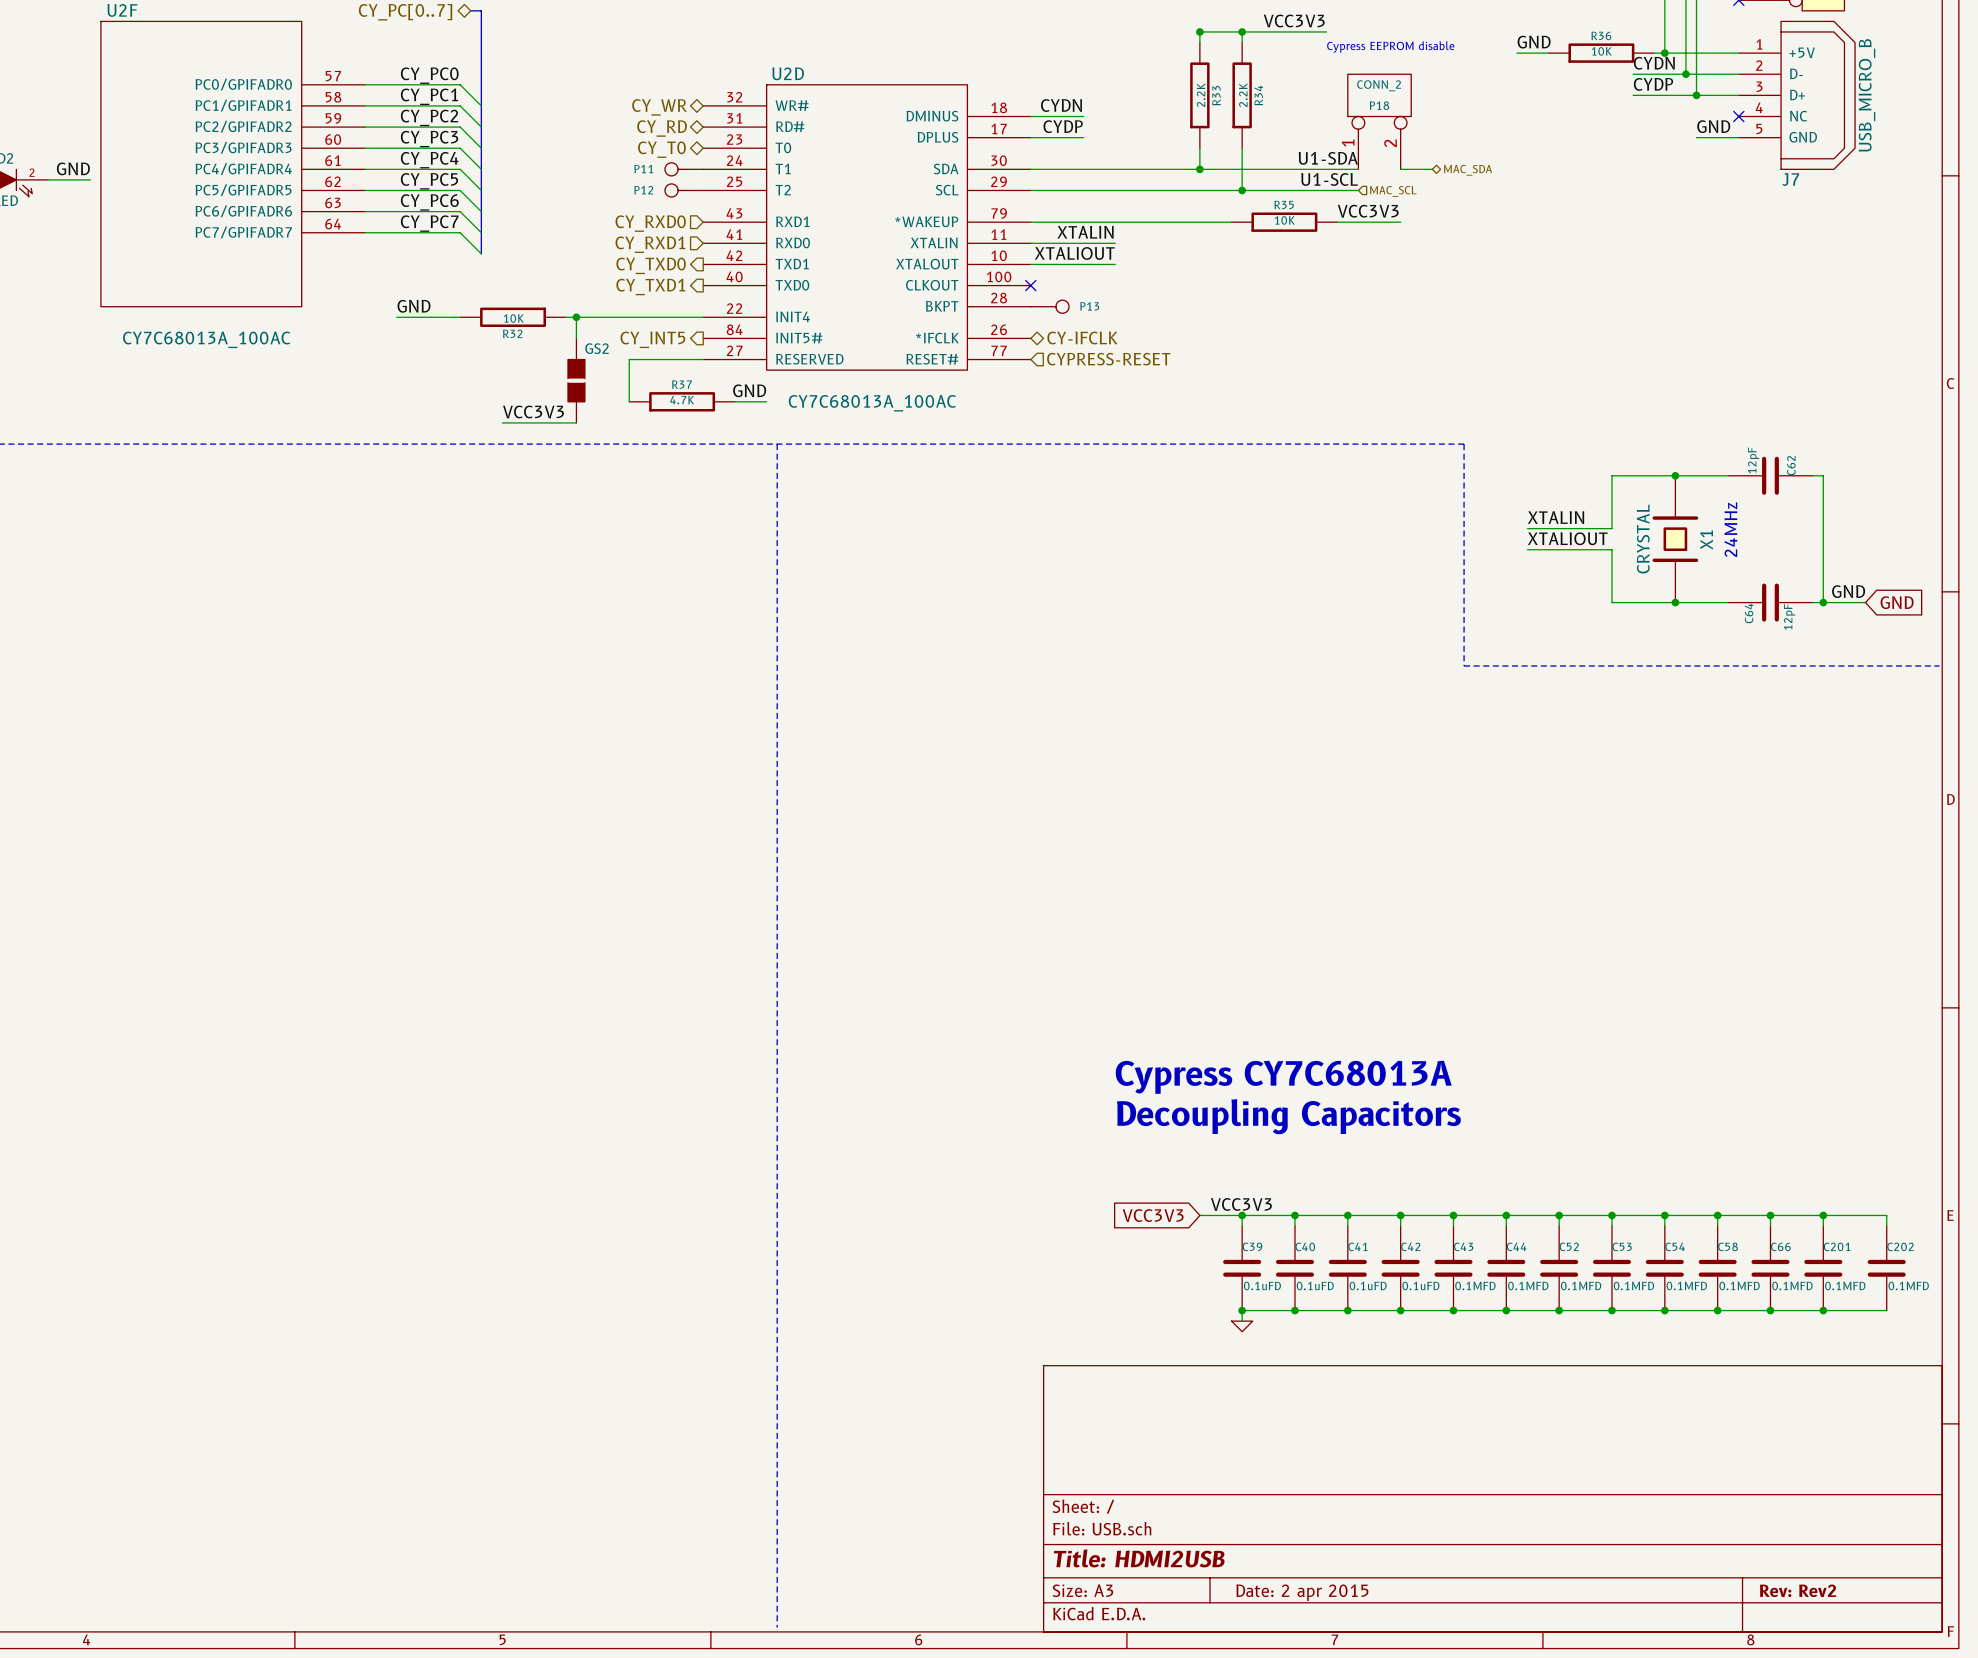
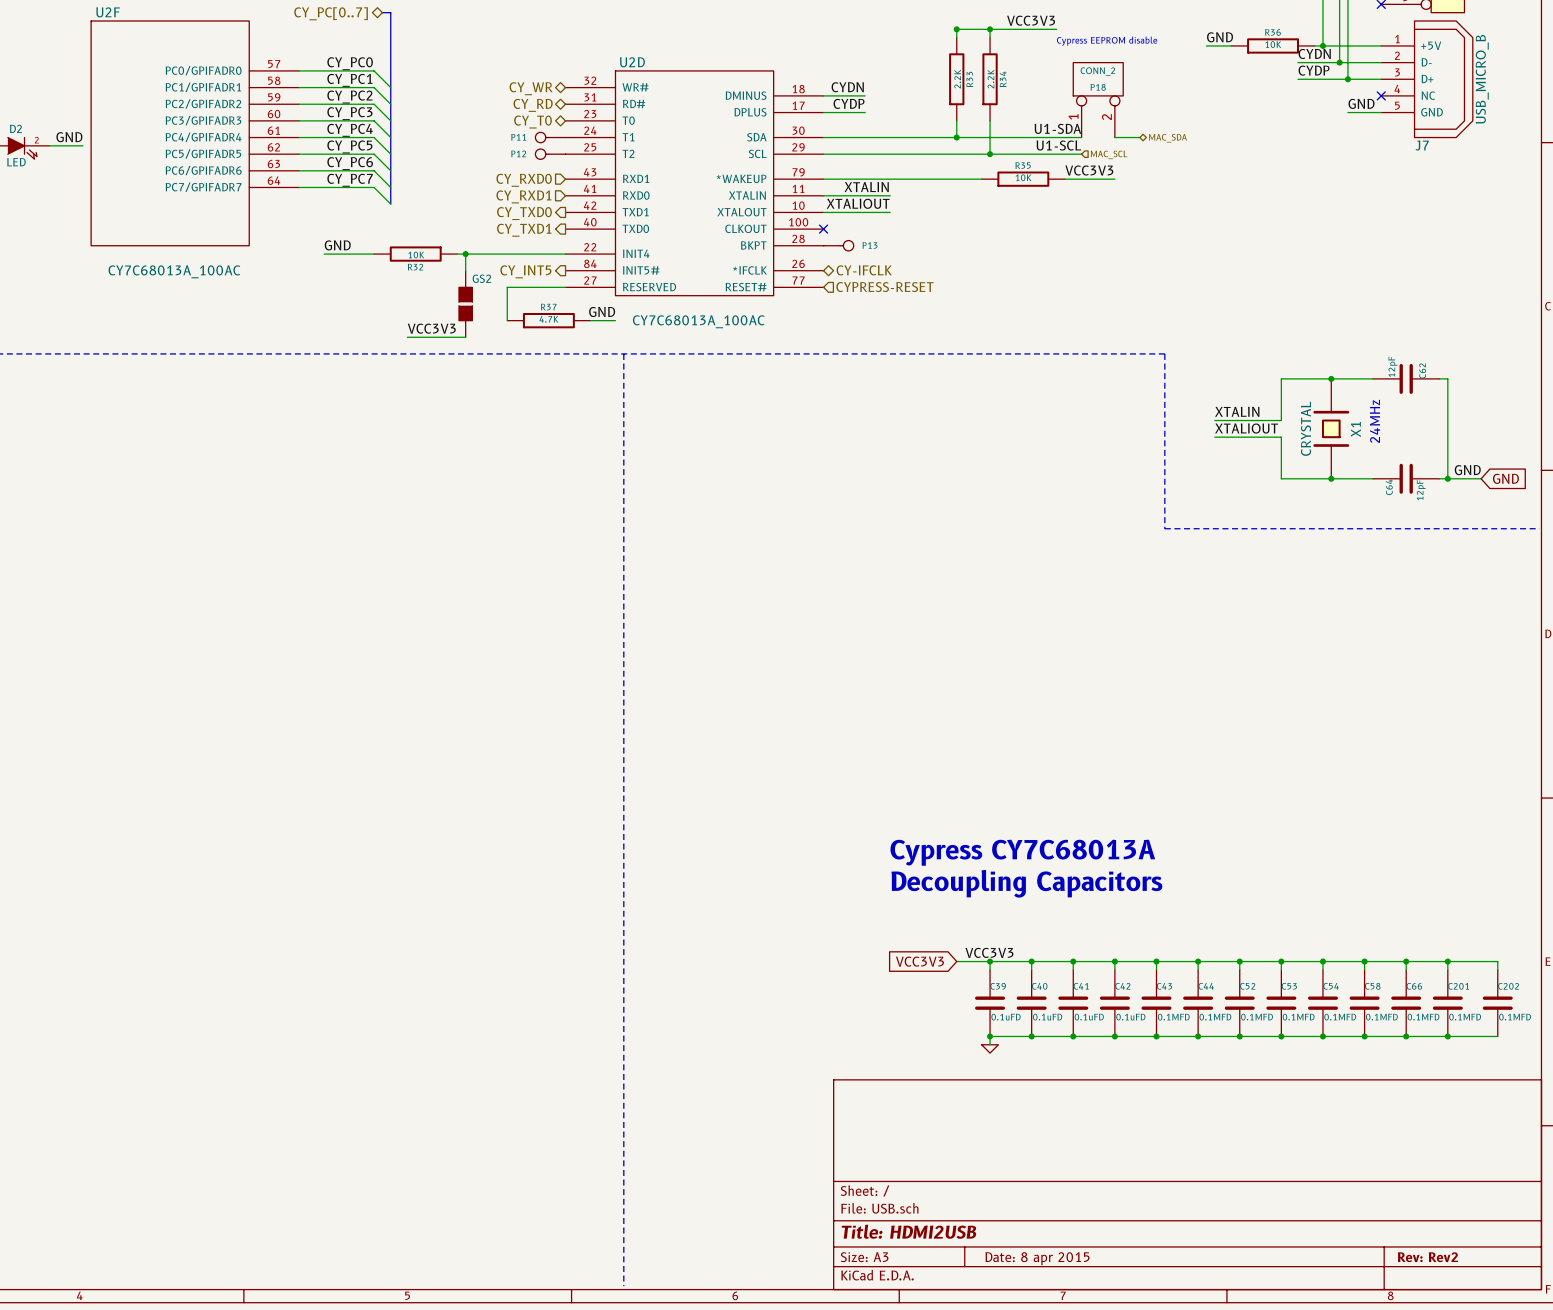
title block: Date: 2 apr 2015 (1302, 1592) -> Date: 8 apr 2015 (1037, 1258)

